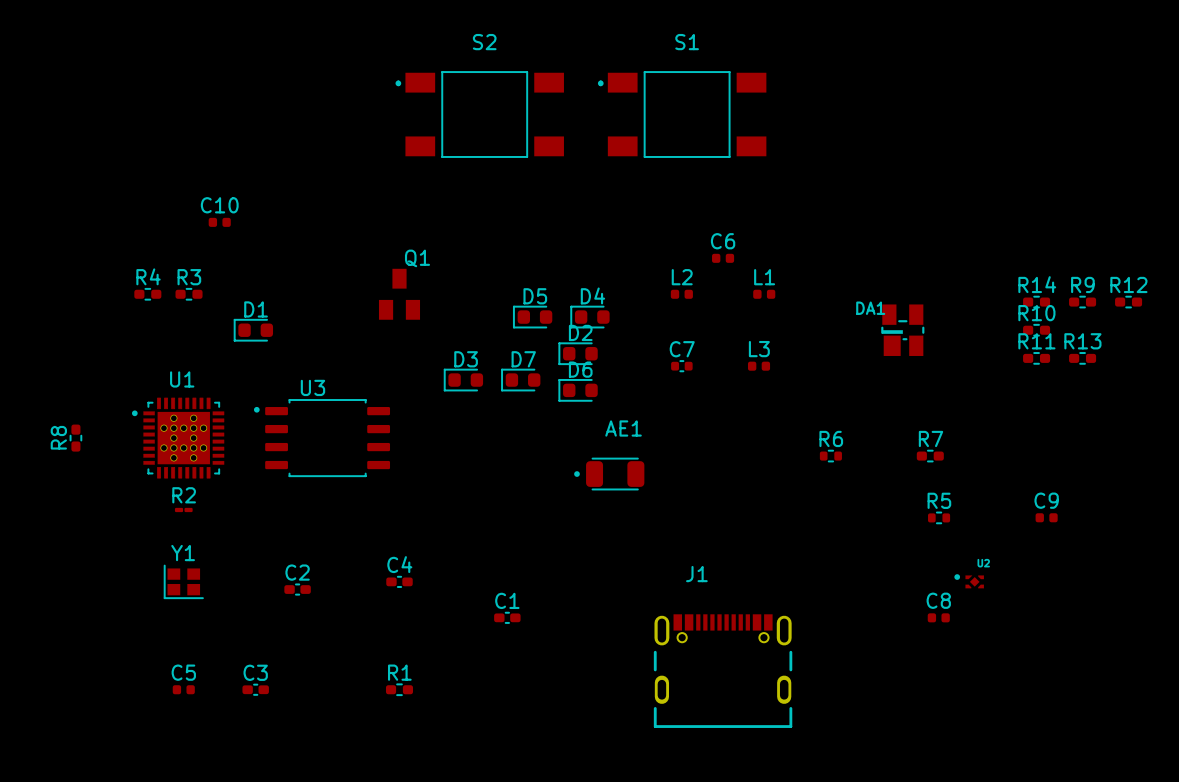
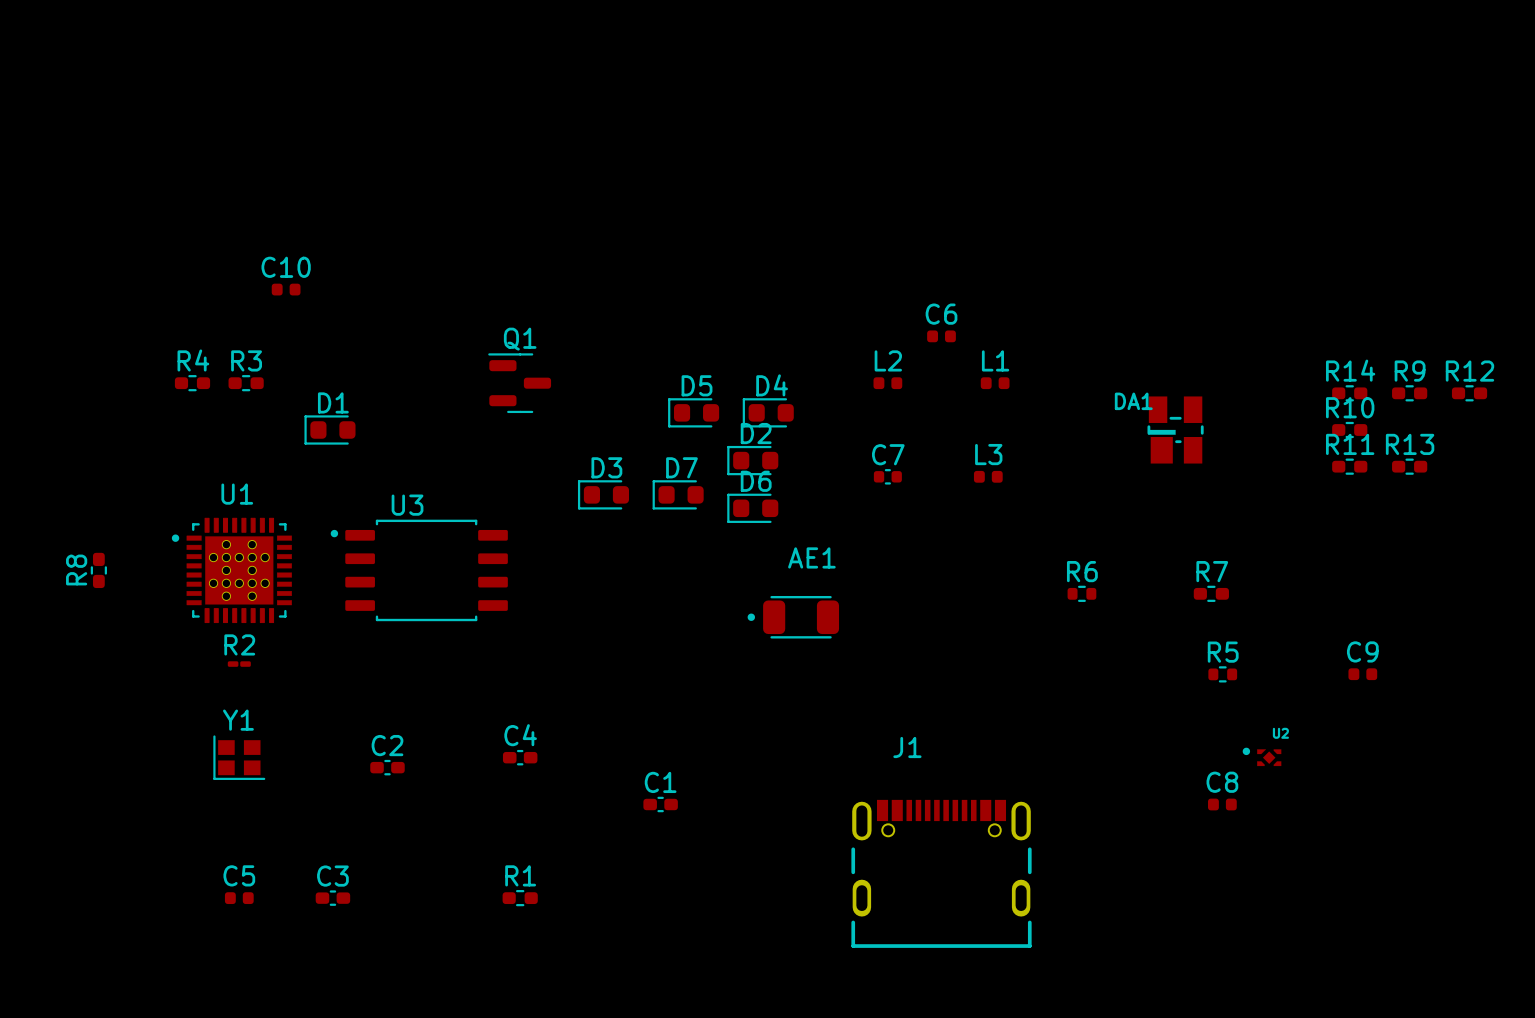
S2: (479, 114) -> none
S1: (682, 114) -> none
Q1 footprint: [378, 268, 421, 320] -> [488, 353, 552, 414]

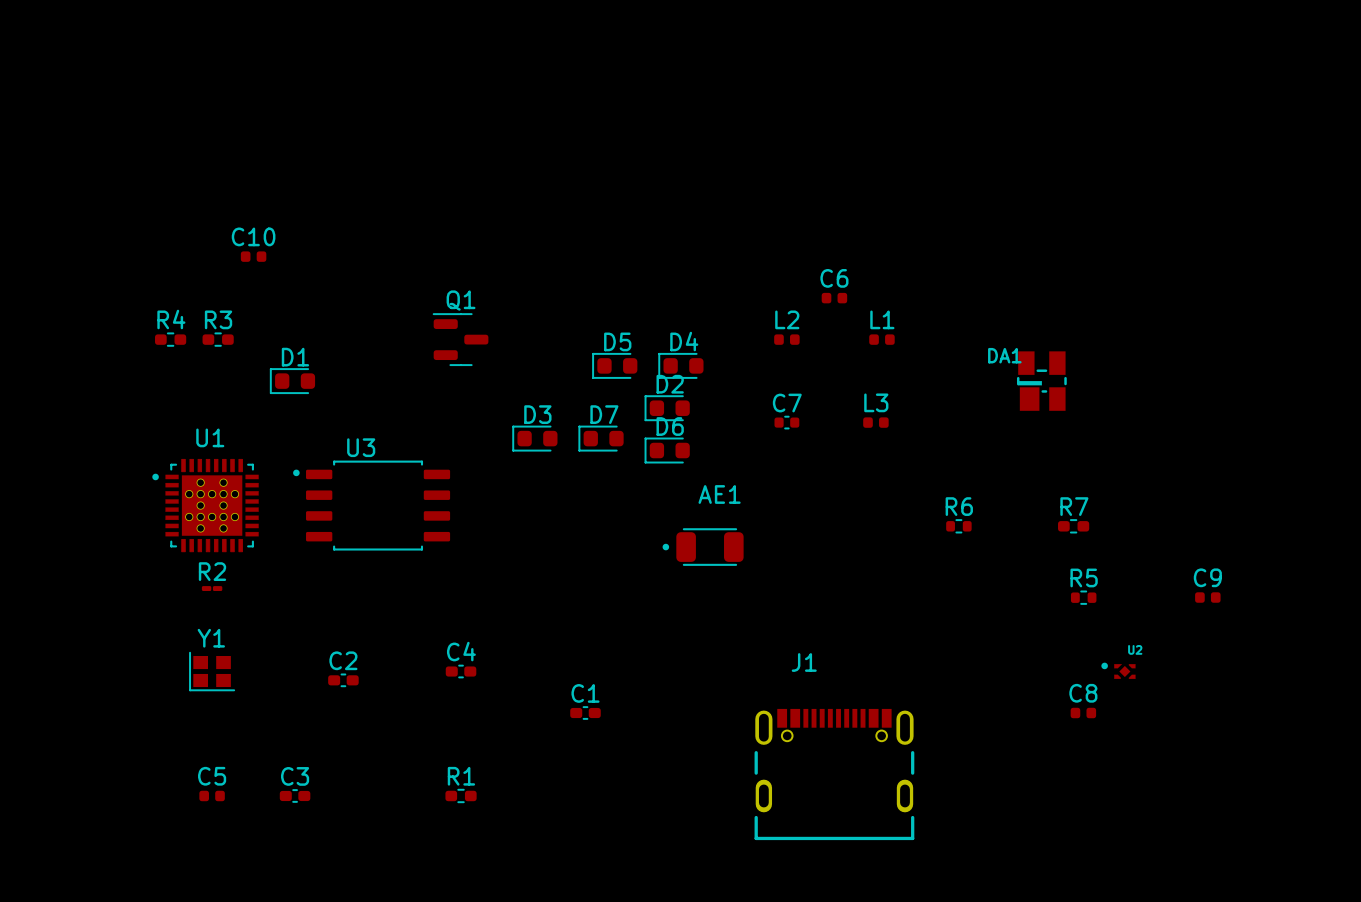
R14: (1349, 393) -> none
R9: (1409, 393) -> none
R12: (1469, 393) -> none
R10: (1349, 429) -> none
R11: (1349, 466) -> none
R13: (1409, 466) -> none
R8: (98, 570) -> none

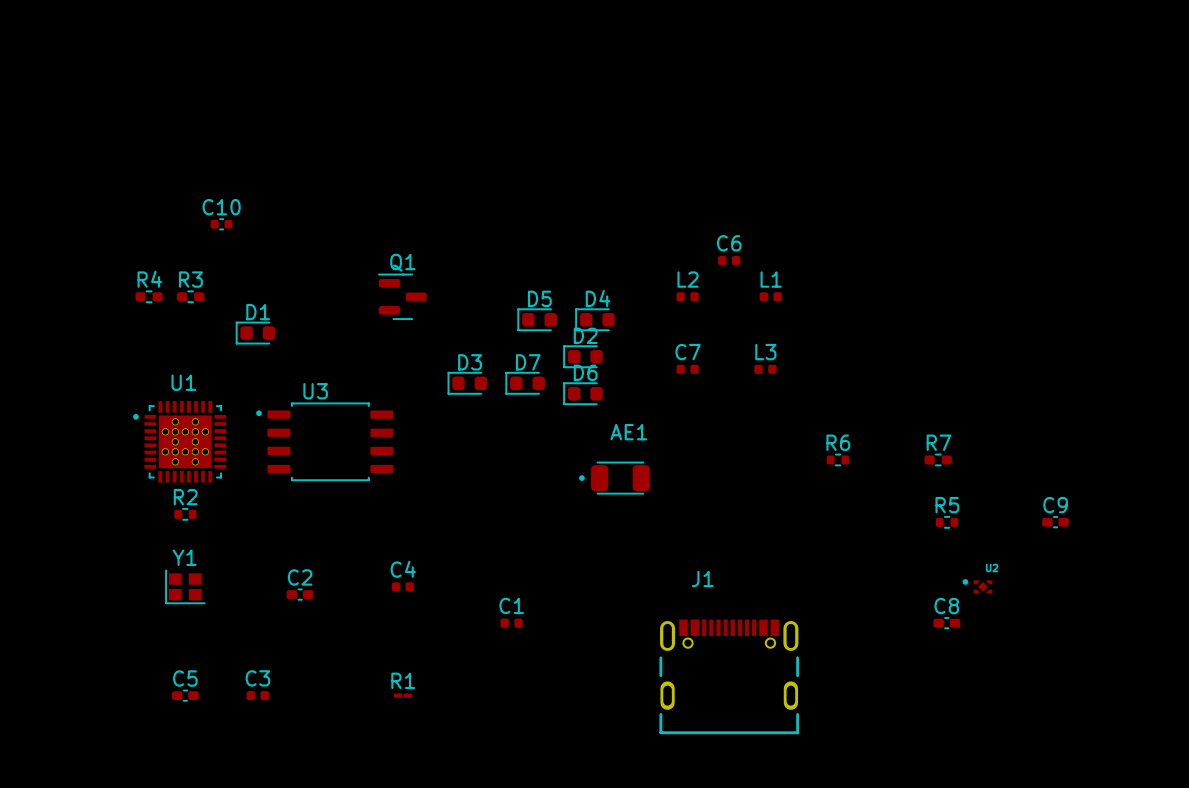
C10 footprint: [240, 251, 267, 262] -> [210, 218, 233, 231]
DA1: (1041, 381) -> none
C7 footprint: [774, 415, 800, 430] -> [676, 364, 699, 374]
R2 footprint: [201, 586, 223, 591] -> [174, 508, 197, 521]
C9 footprint: [1195, 592, 1221, 603] -> [1042, 516, 1069, 529]
C4 footprint: [445, 664, 477, 679] -> [391, 582, 415, 592]
C1 footprint: [570, 706, 601, 720] -> [500, 618, 523, 628]
C8 footprint: [1070, 707, 1097, 719] -> [933, 617, 961, 630]
R1 footprint: [445, 788, 477, 804] -> [393, 693, 412, 698]
C3 footprint: [279, 789, 311, 803] -> [246, 691, 270, 701]
C5 footprint: [199, 790, 225, 802] -> [172, 689, 199, 702]

